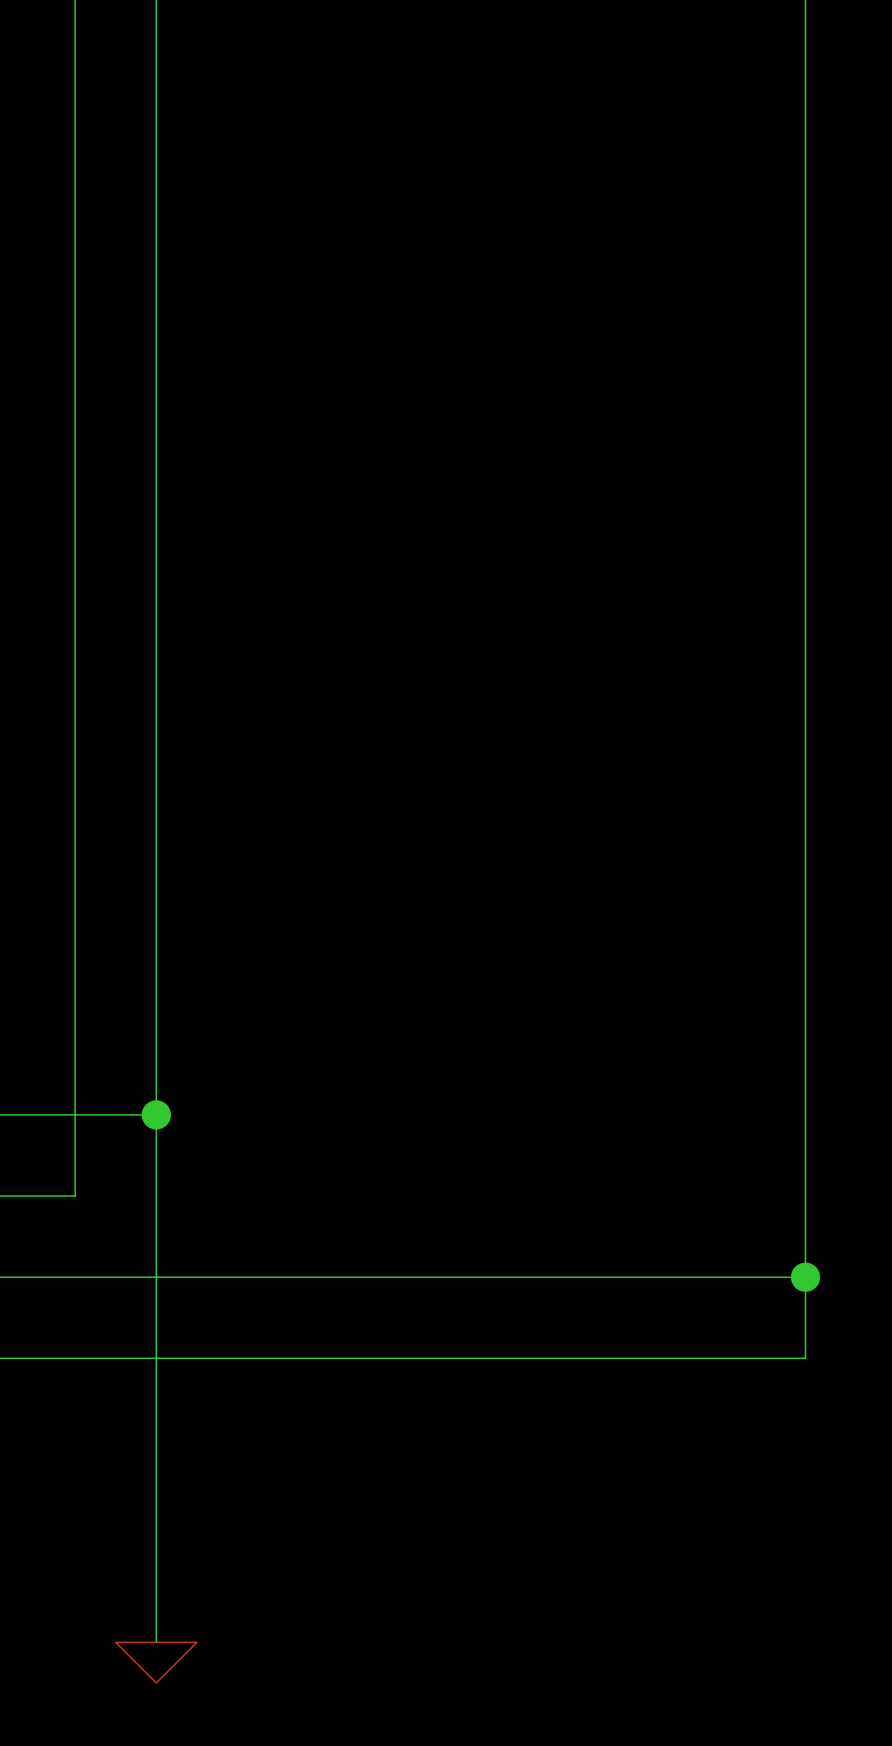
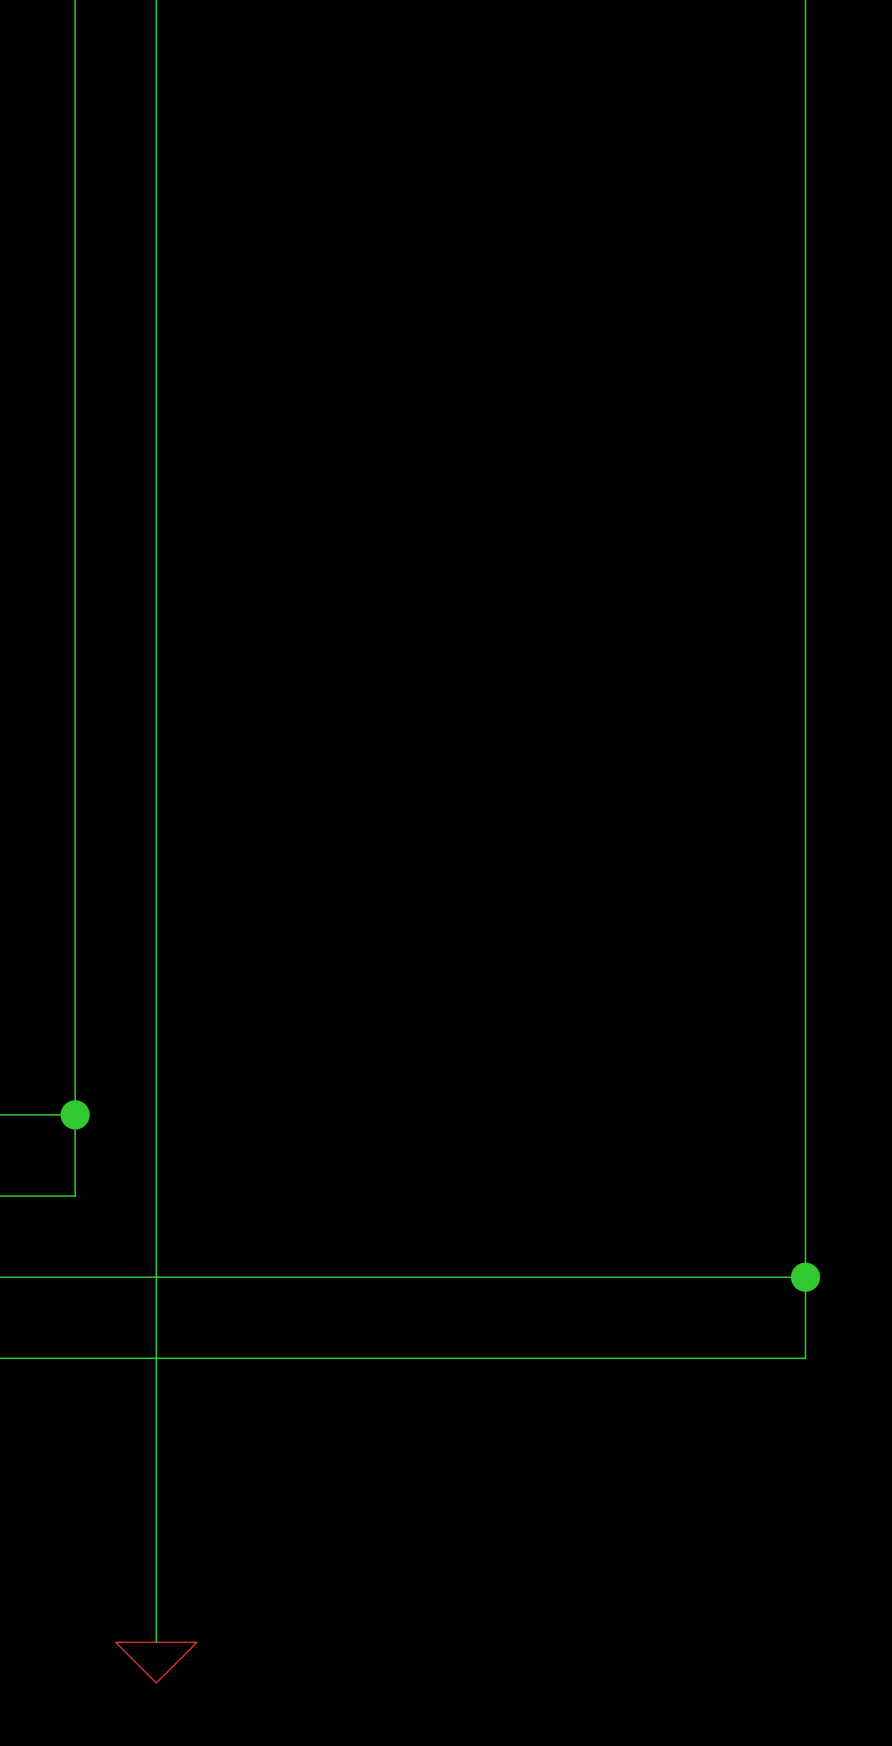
wire: (75, 1114) (156, 1114) -> none
junction position: (156, 1114) -> (75, 1114)

